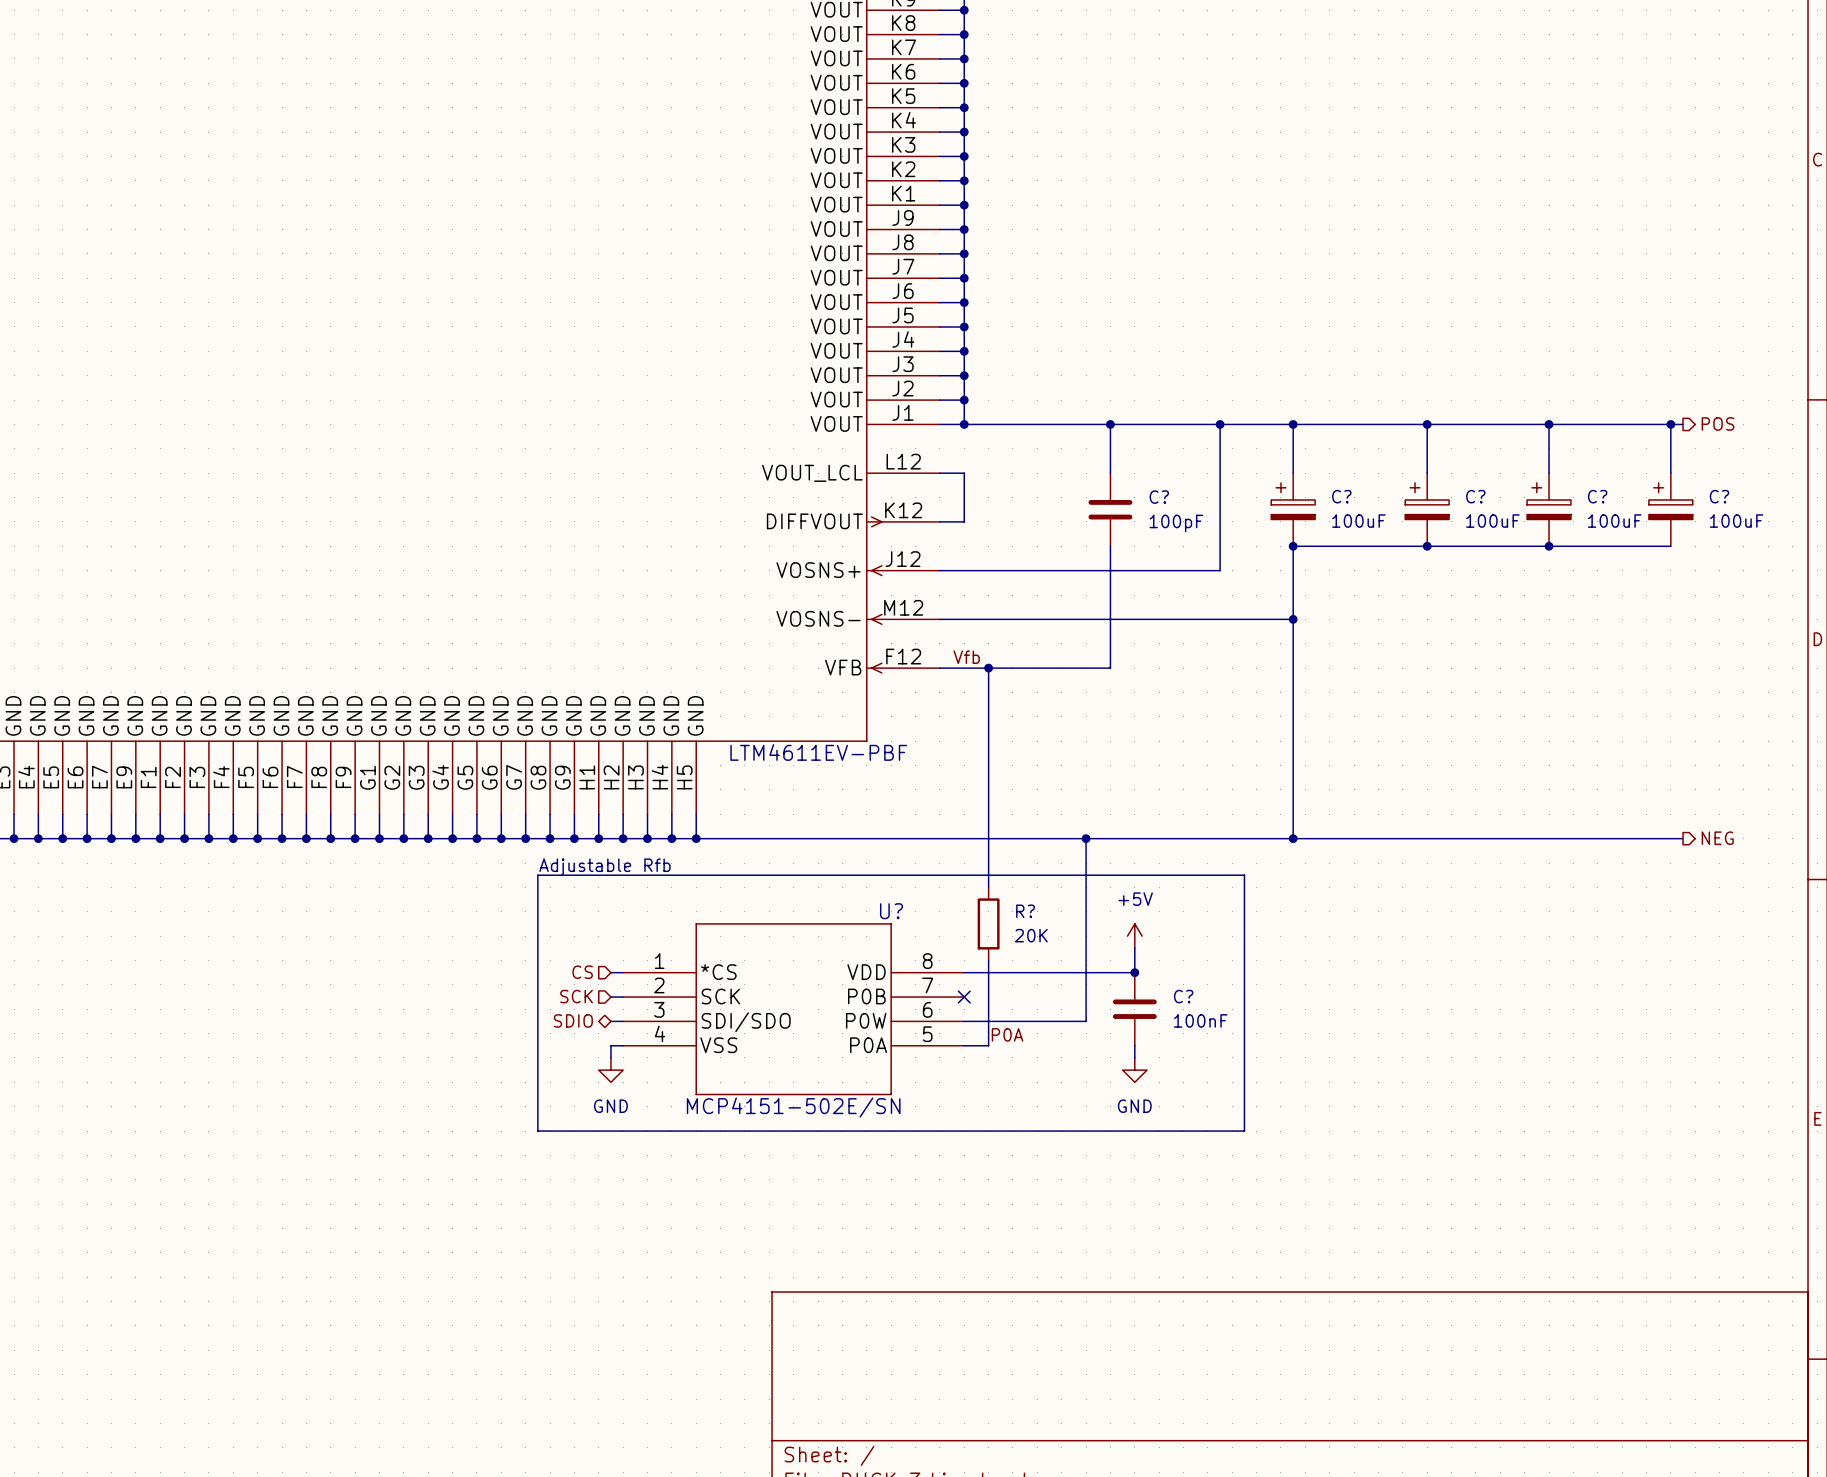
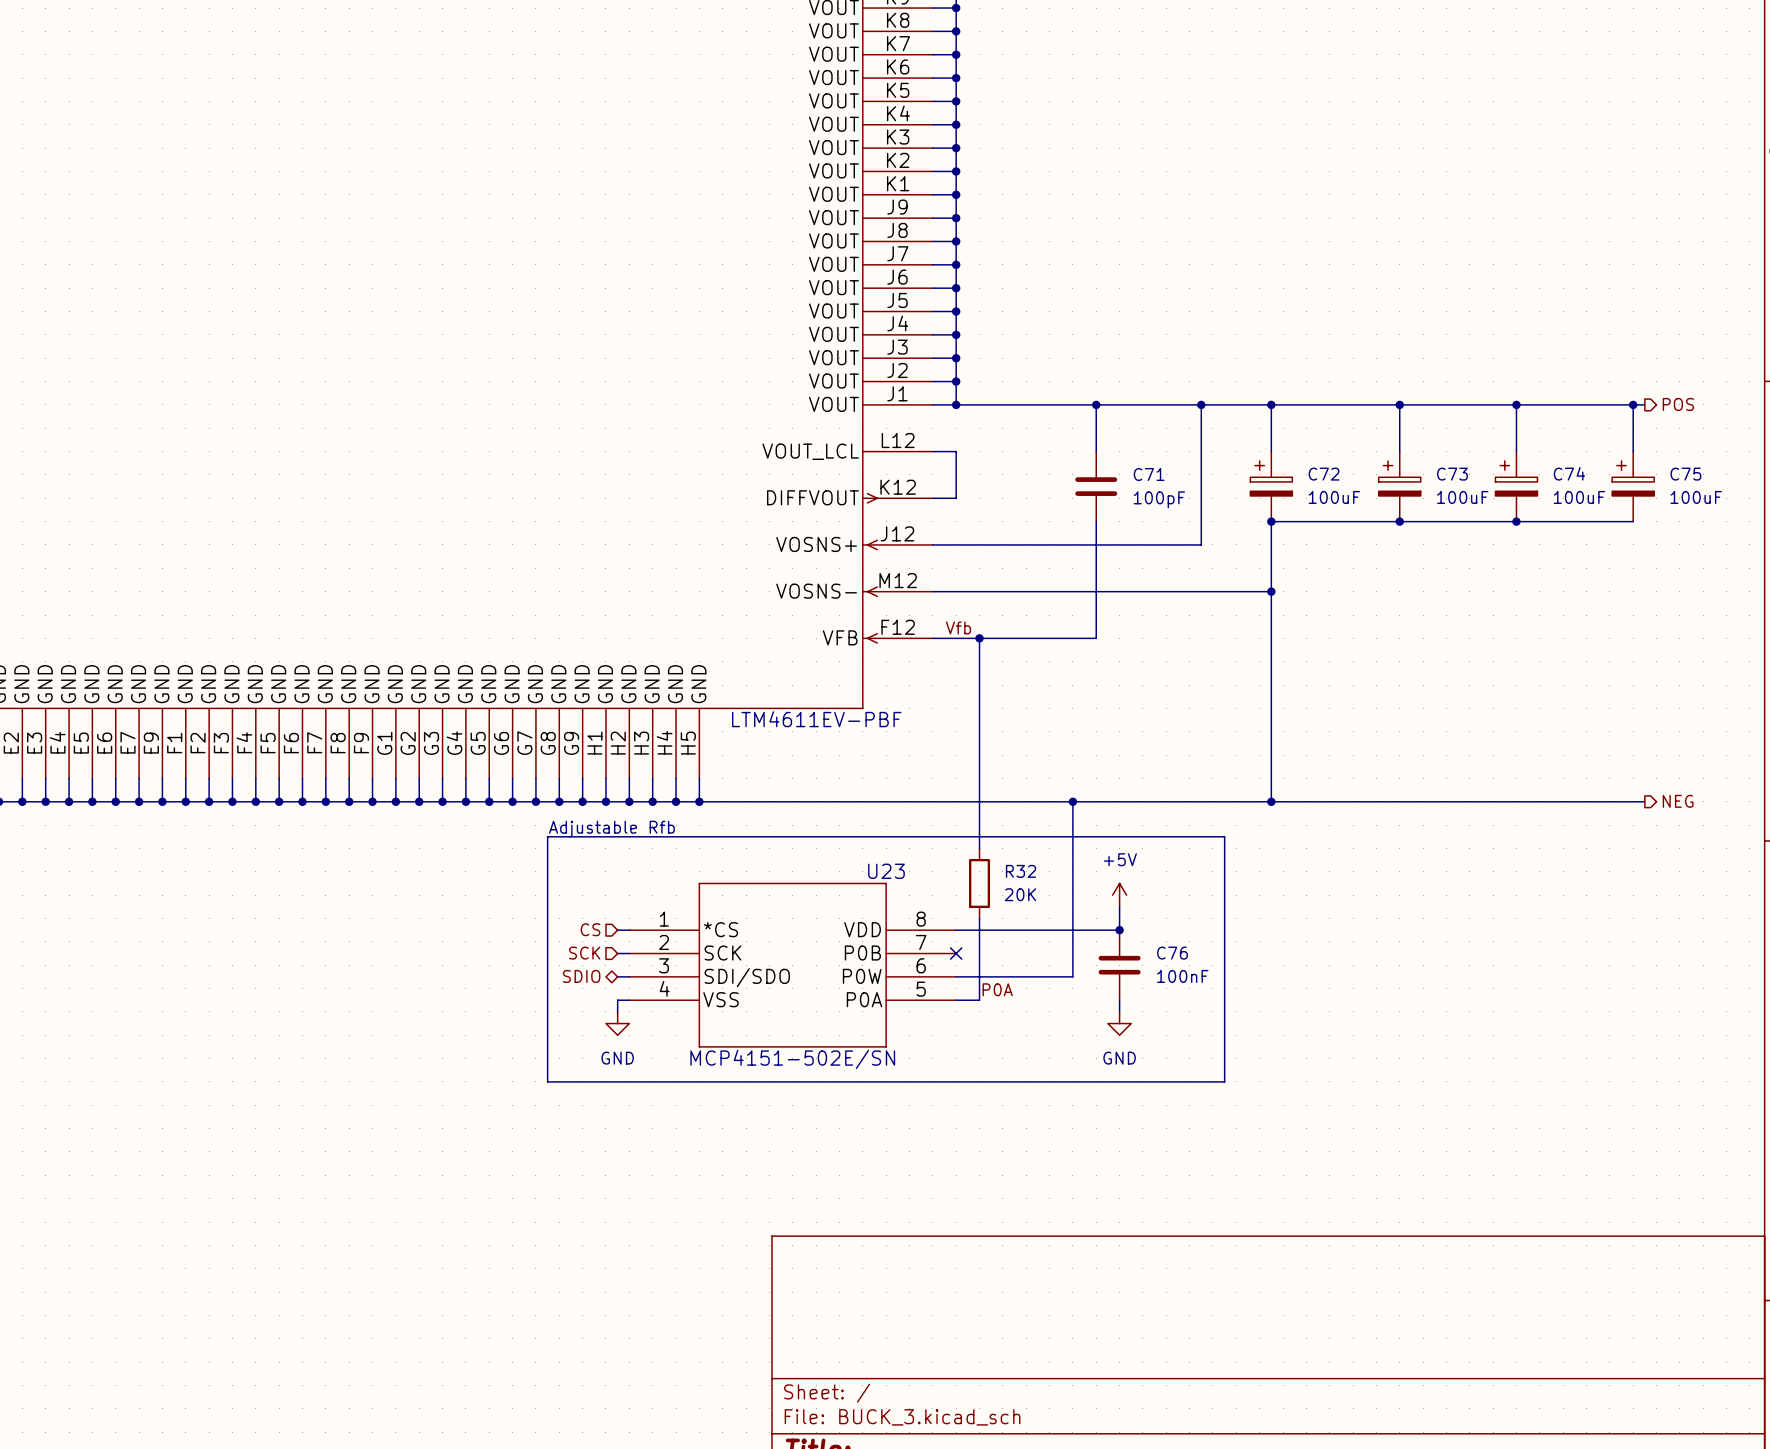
C? name: C? (1341, 496) -> C72 (1324, 474)
C? name: C? (1475, 496) -> C73 (1452, 474)
C? name: C? (1597, 496) -> C74 (1569, 473)
C? name: C? (1719, 496) -> C75 (1685, 474)
C? name: C? (1159, 497) -> C71 (1149, 474)
U? name: U? (891, 911) -> U23 (886, 871)
R? name: R? (1025, 911) -> R32 (1021, 871)
C? name: C? (1183, 996) -> C76 (1172, 953)

